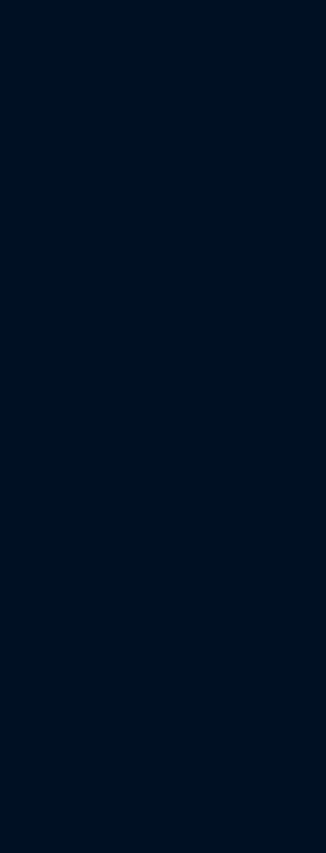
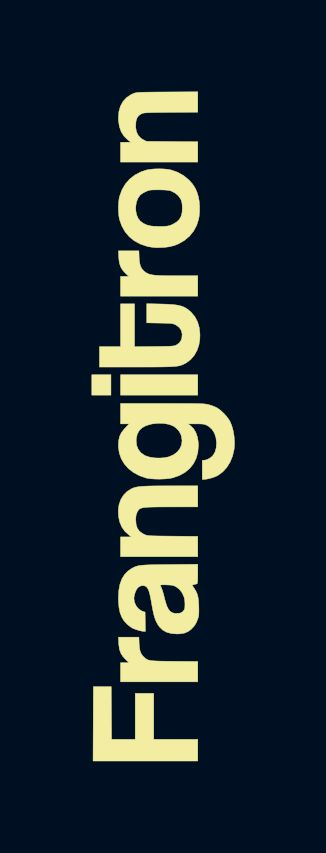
drawing: none -> [91, 91, 235, 762]

